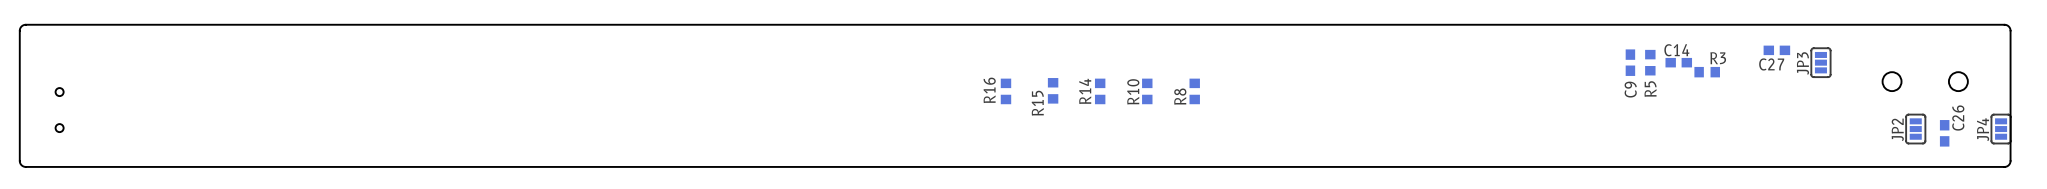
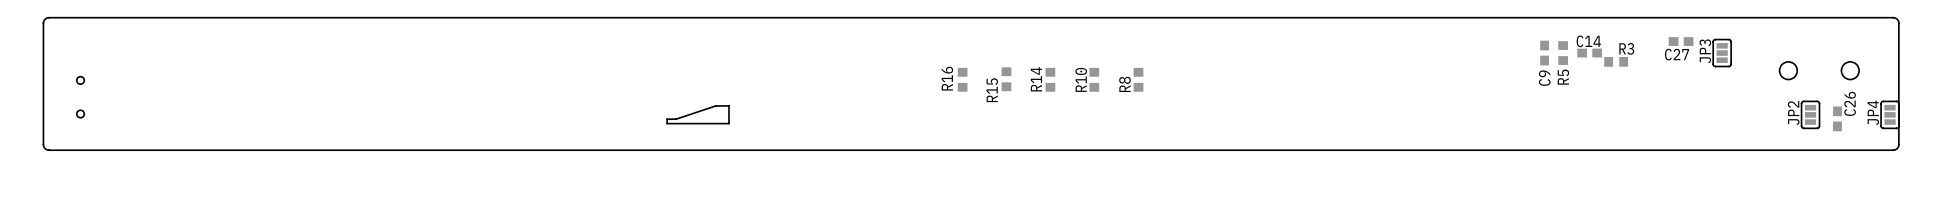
part: none -> (698, 114)

